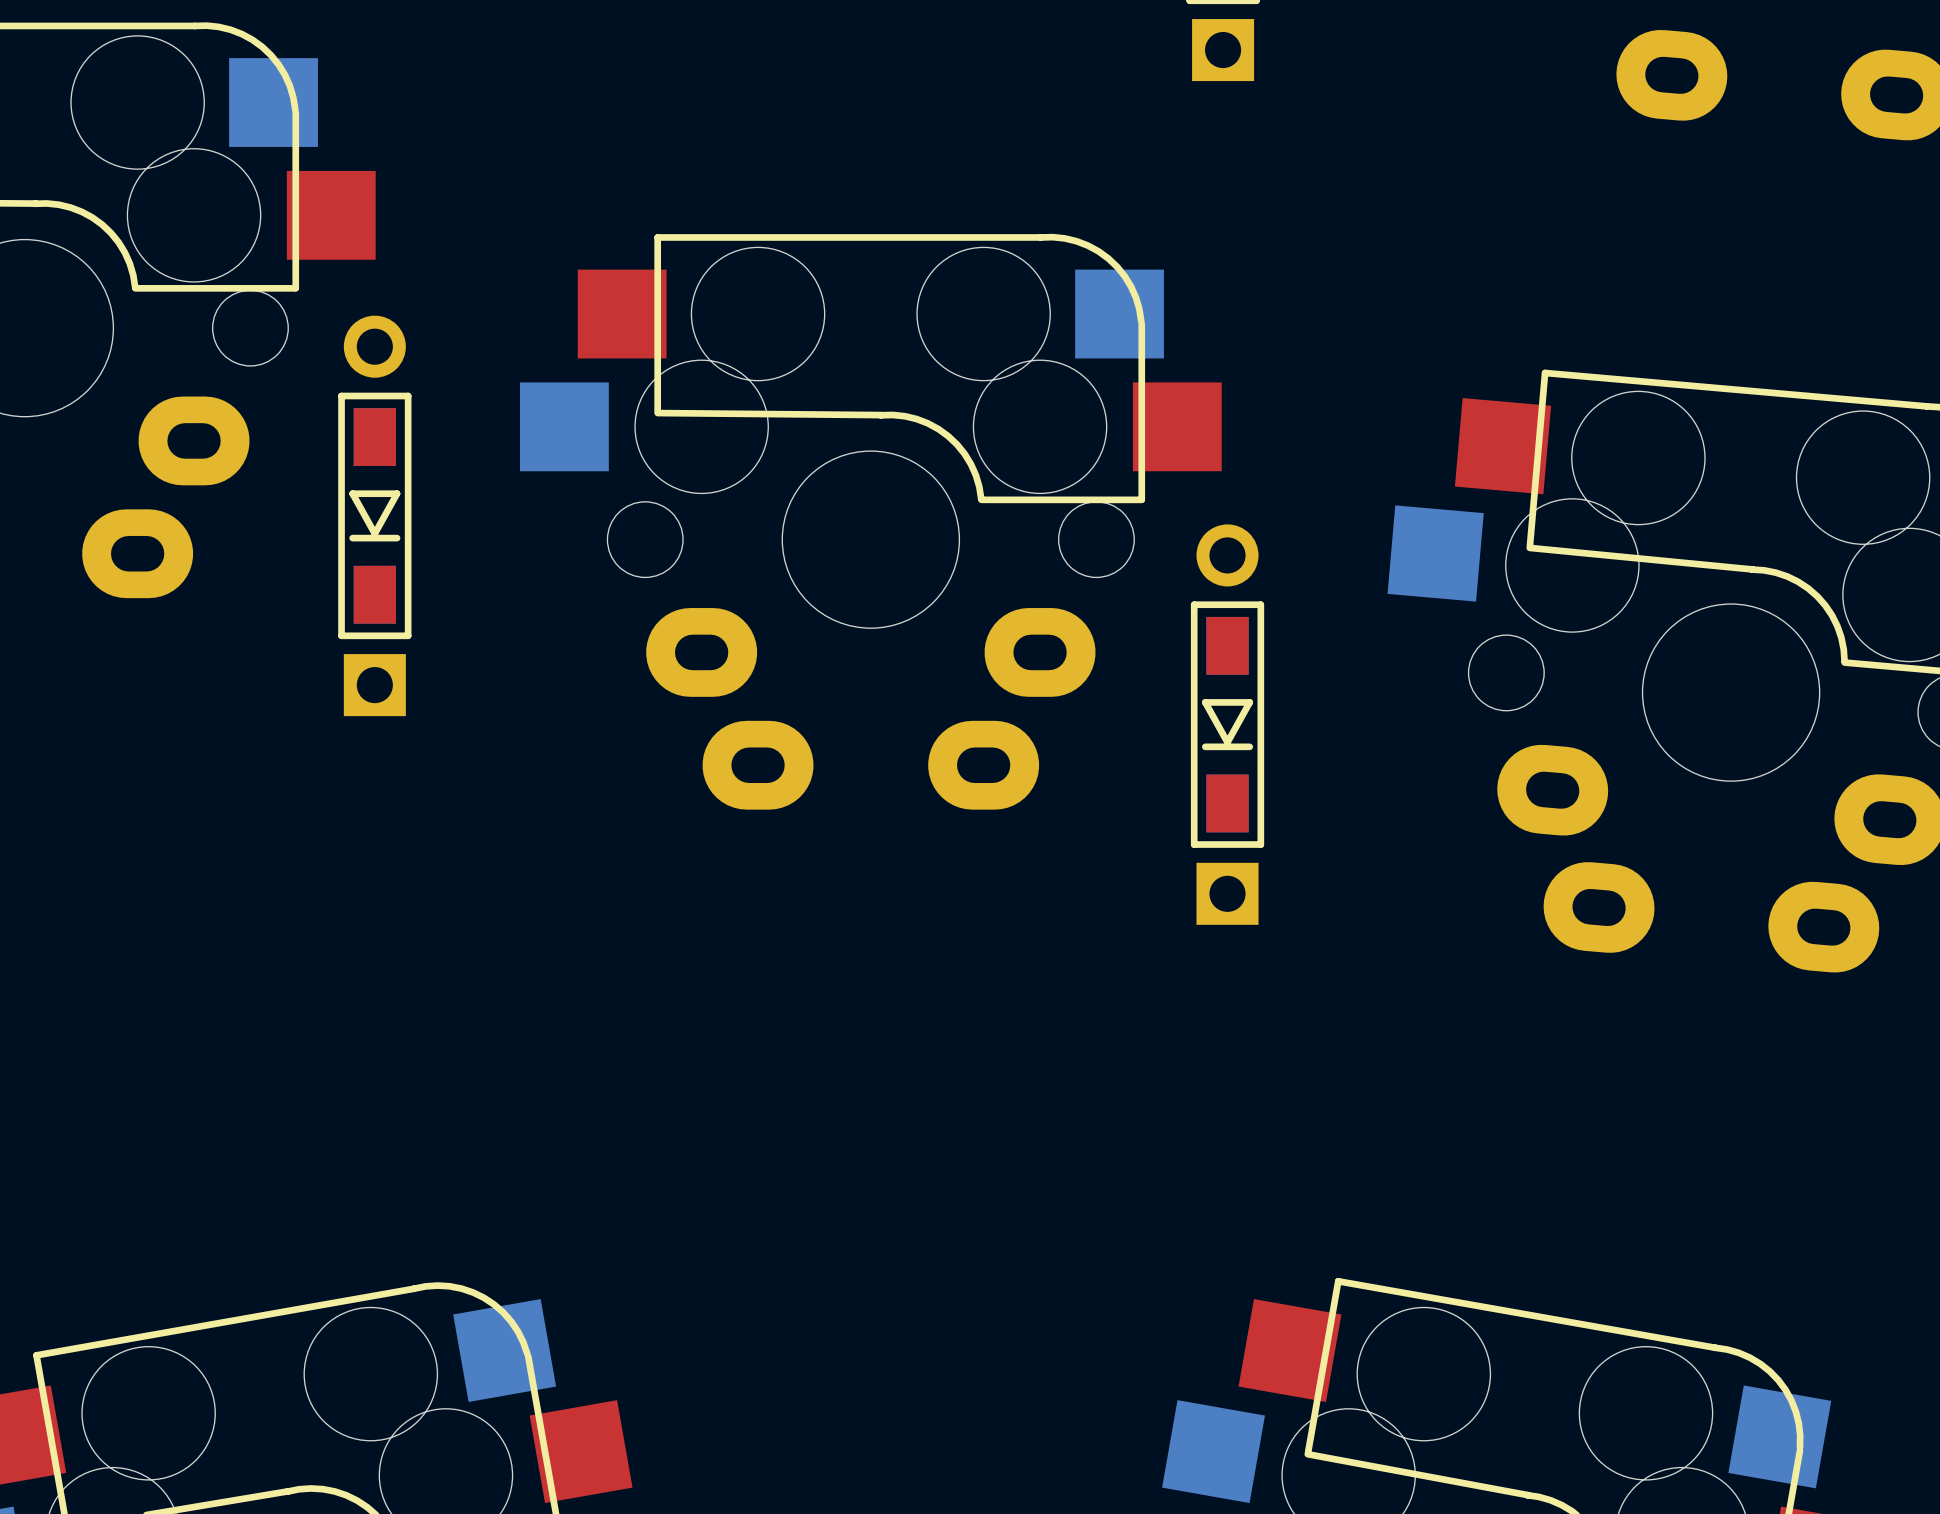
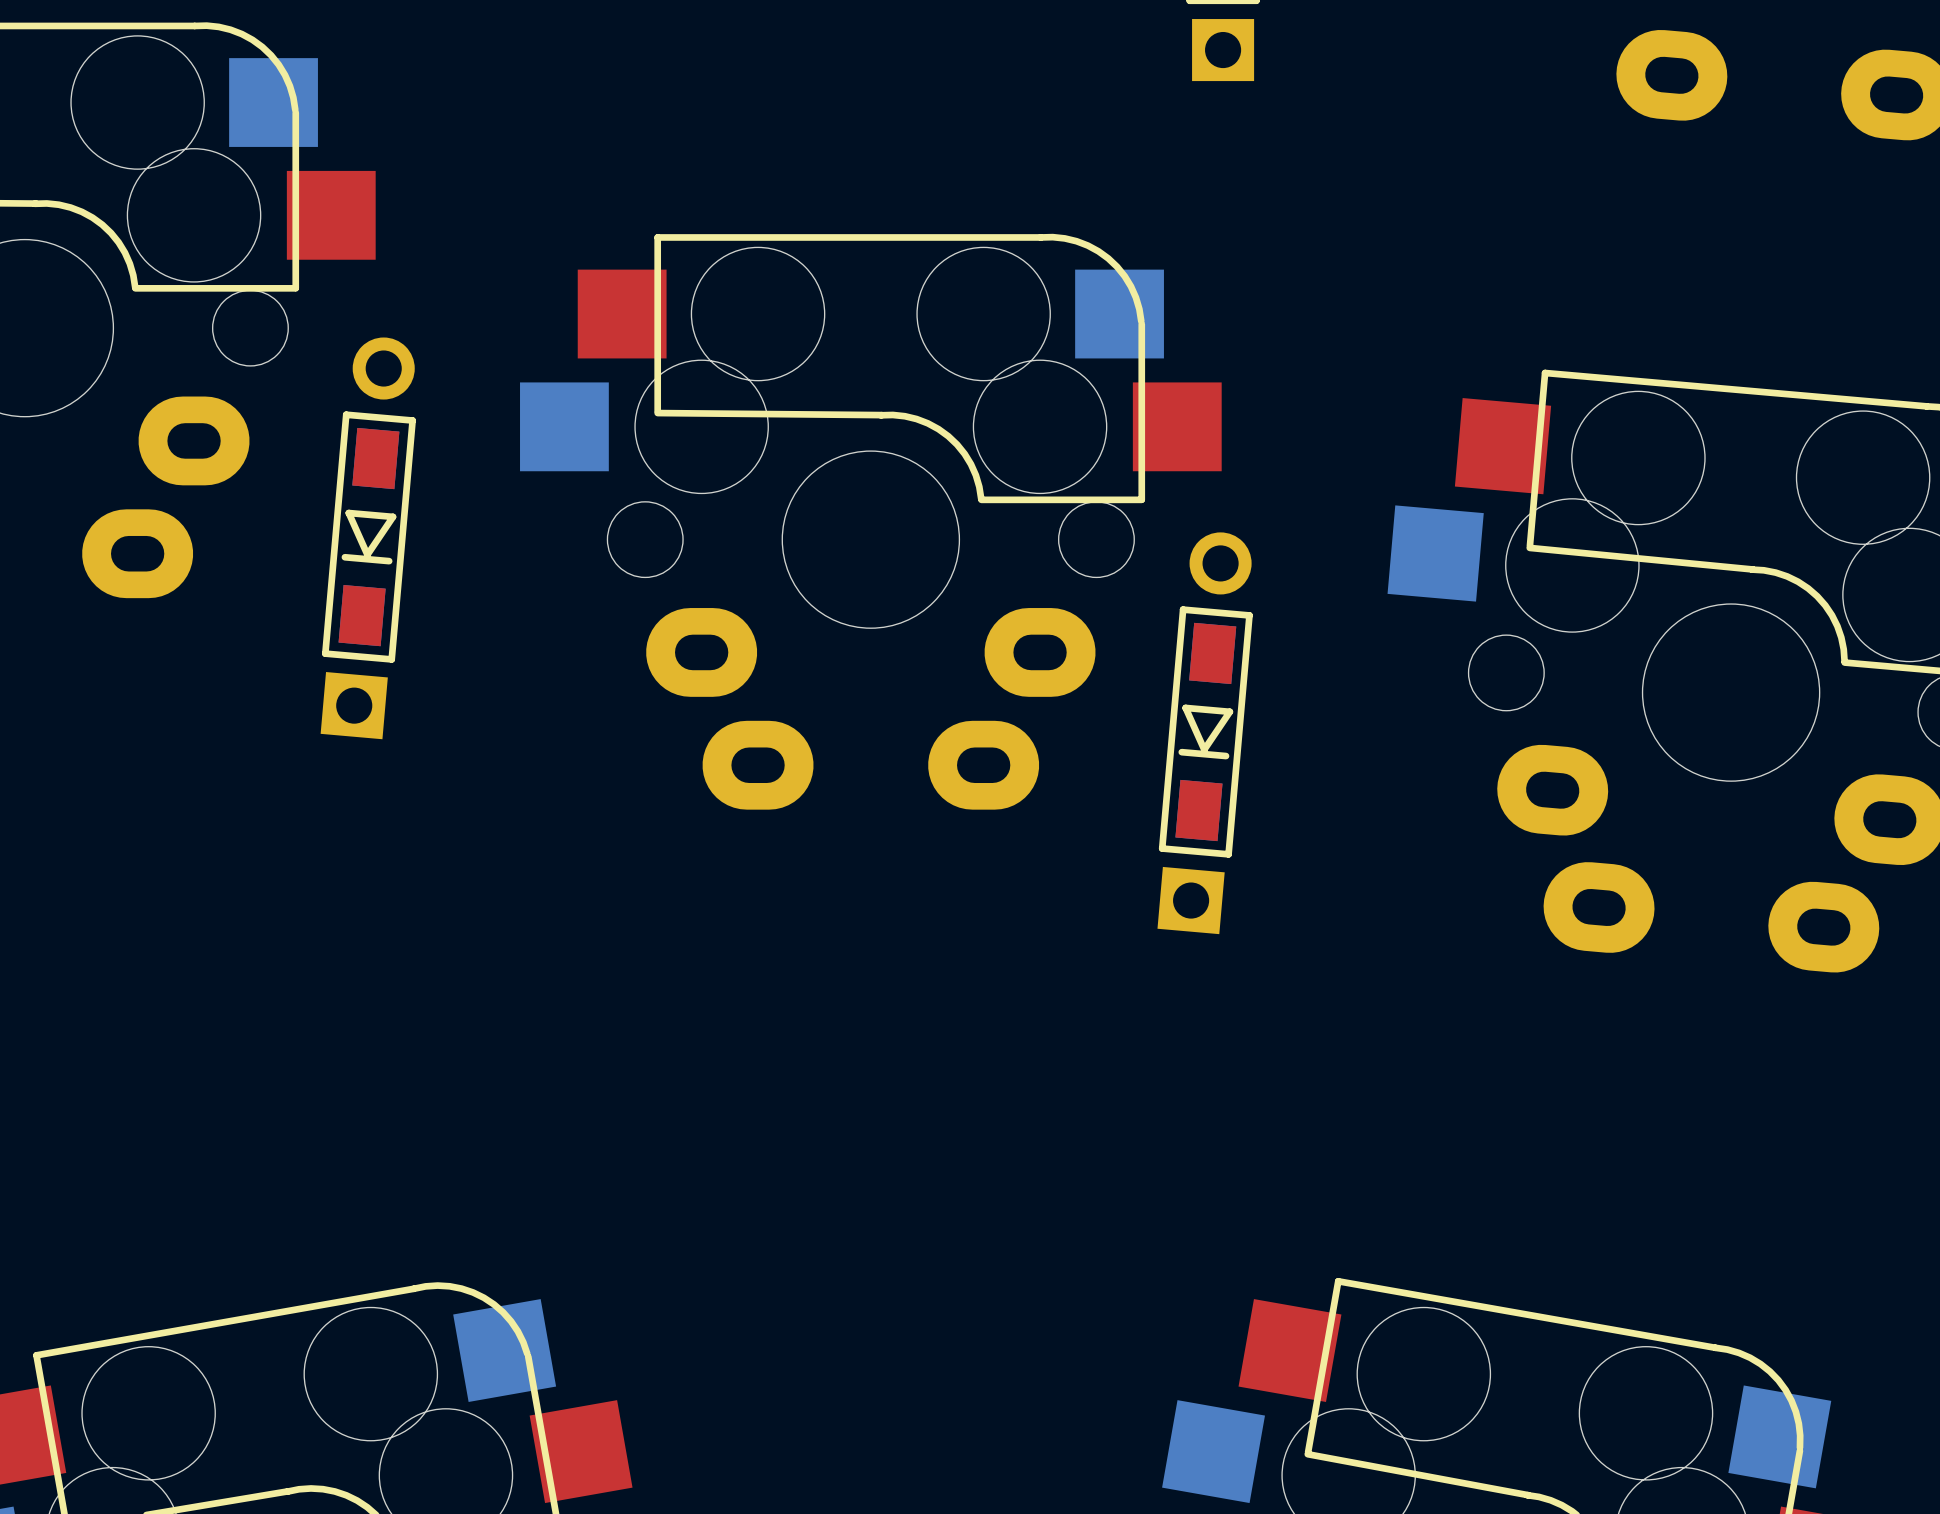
part rotation: 0° (374, 515) -> 5° clockwise (368, 538)
part rotation: 0° (1227, 724) -> 5° clockwise (1205, 733)

